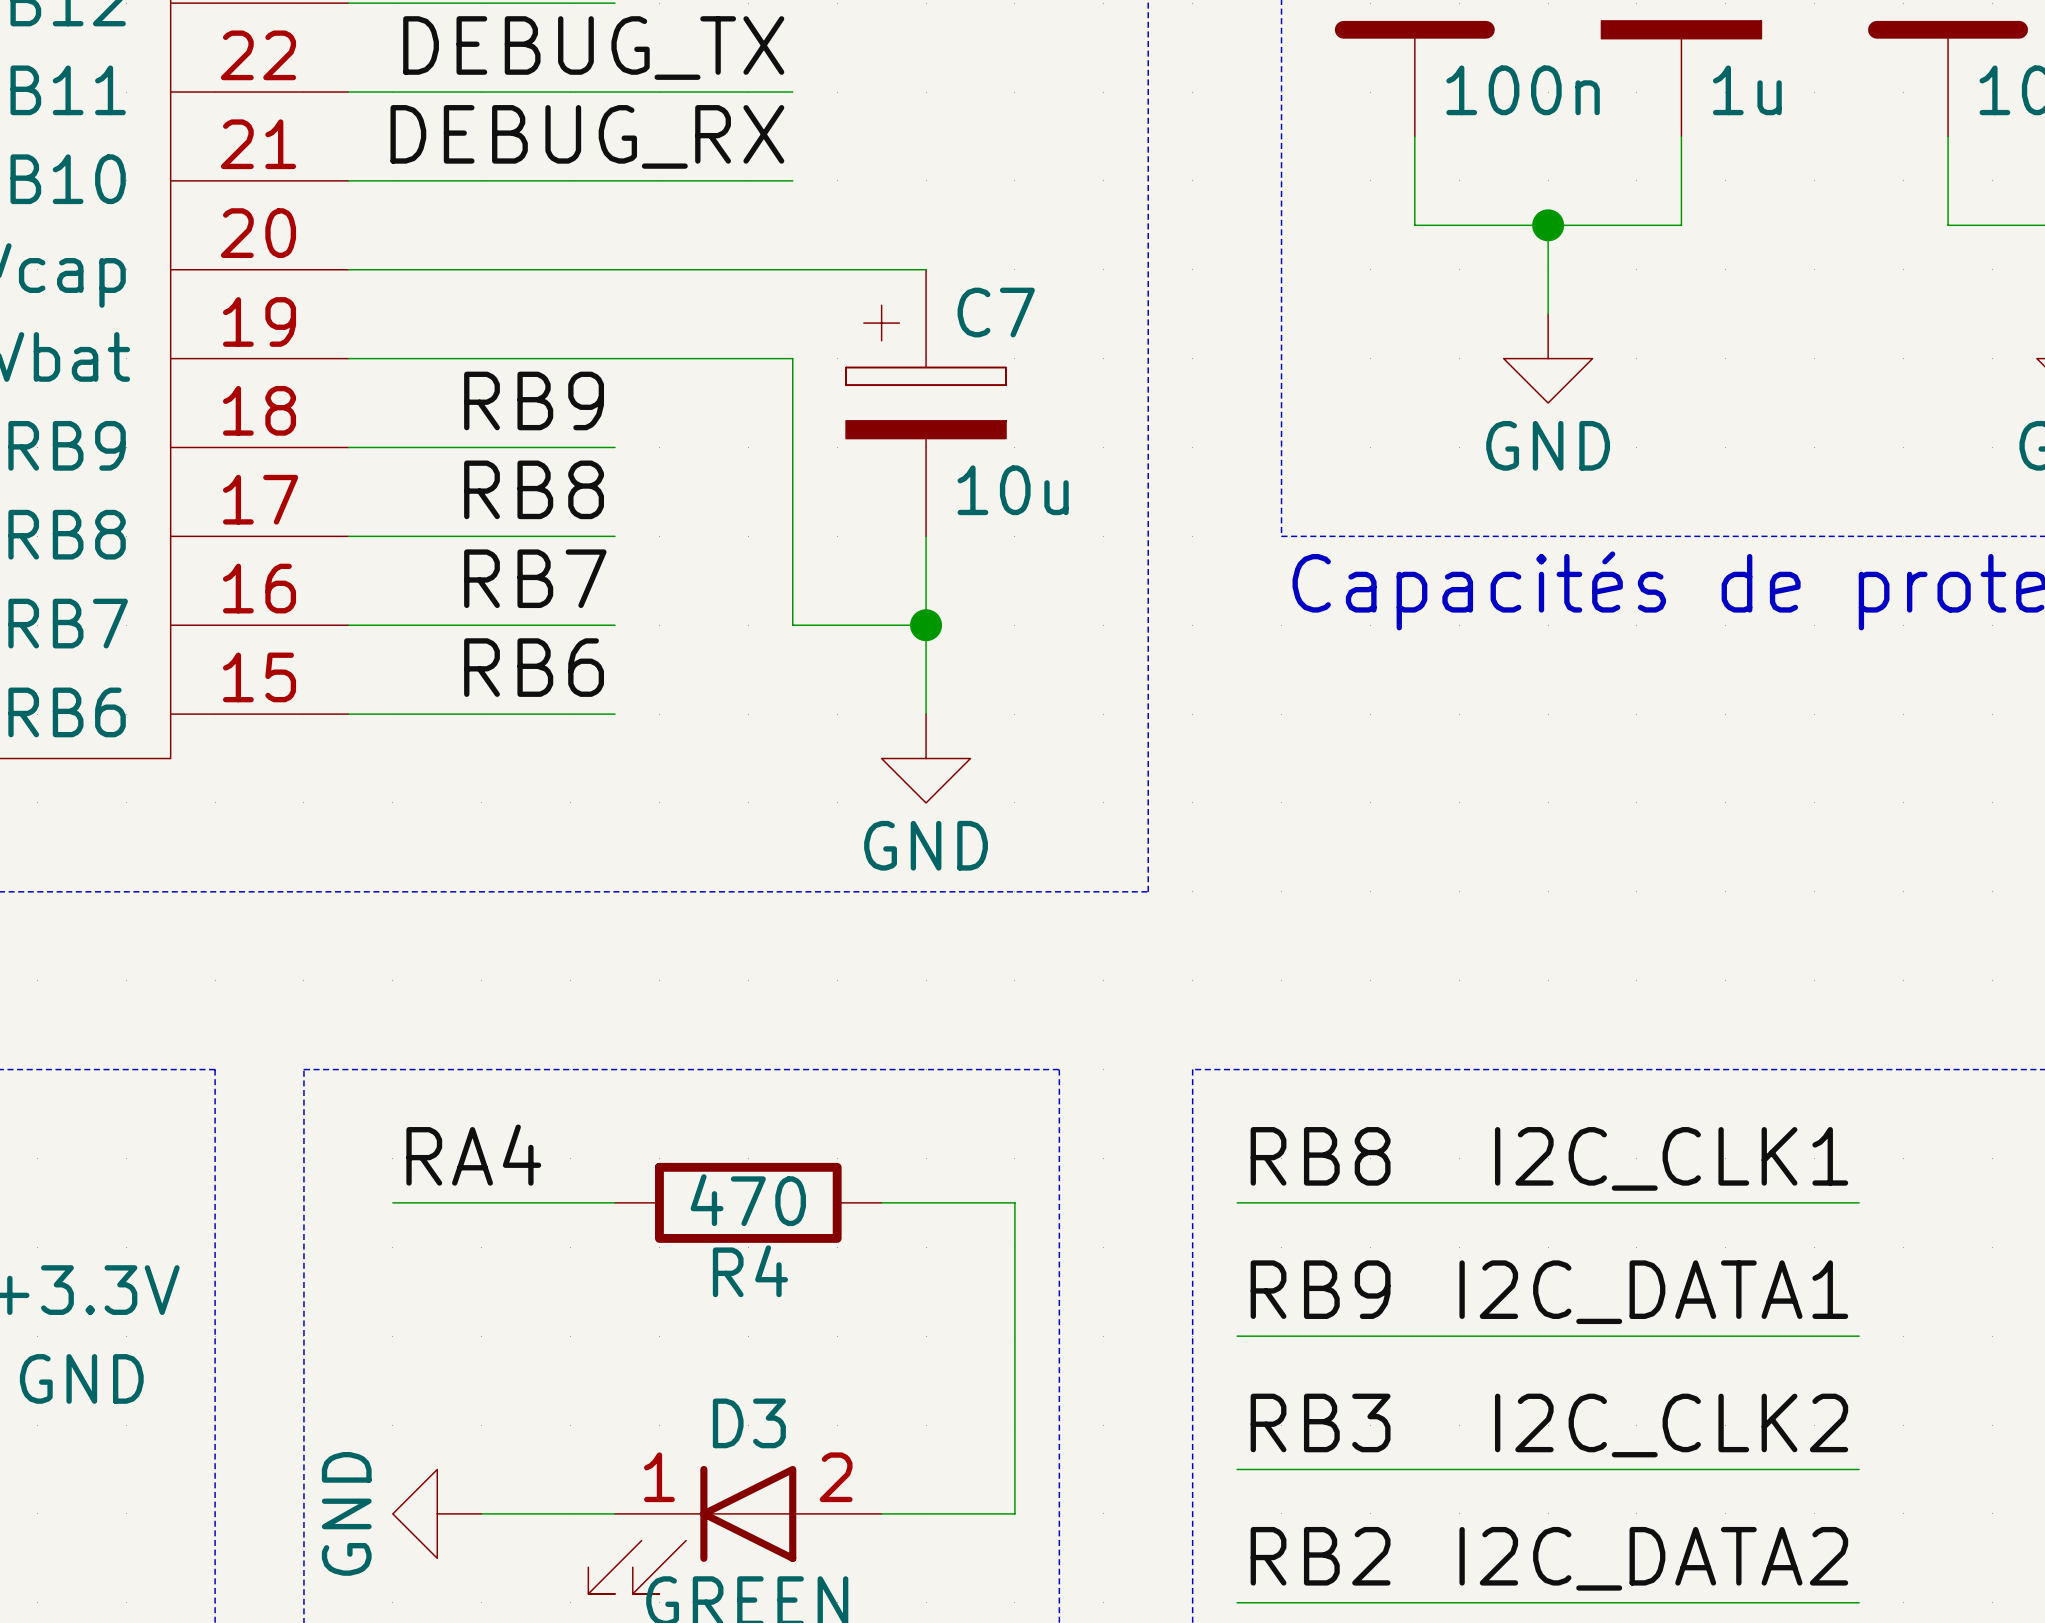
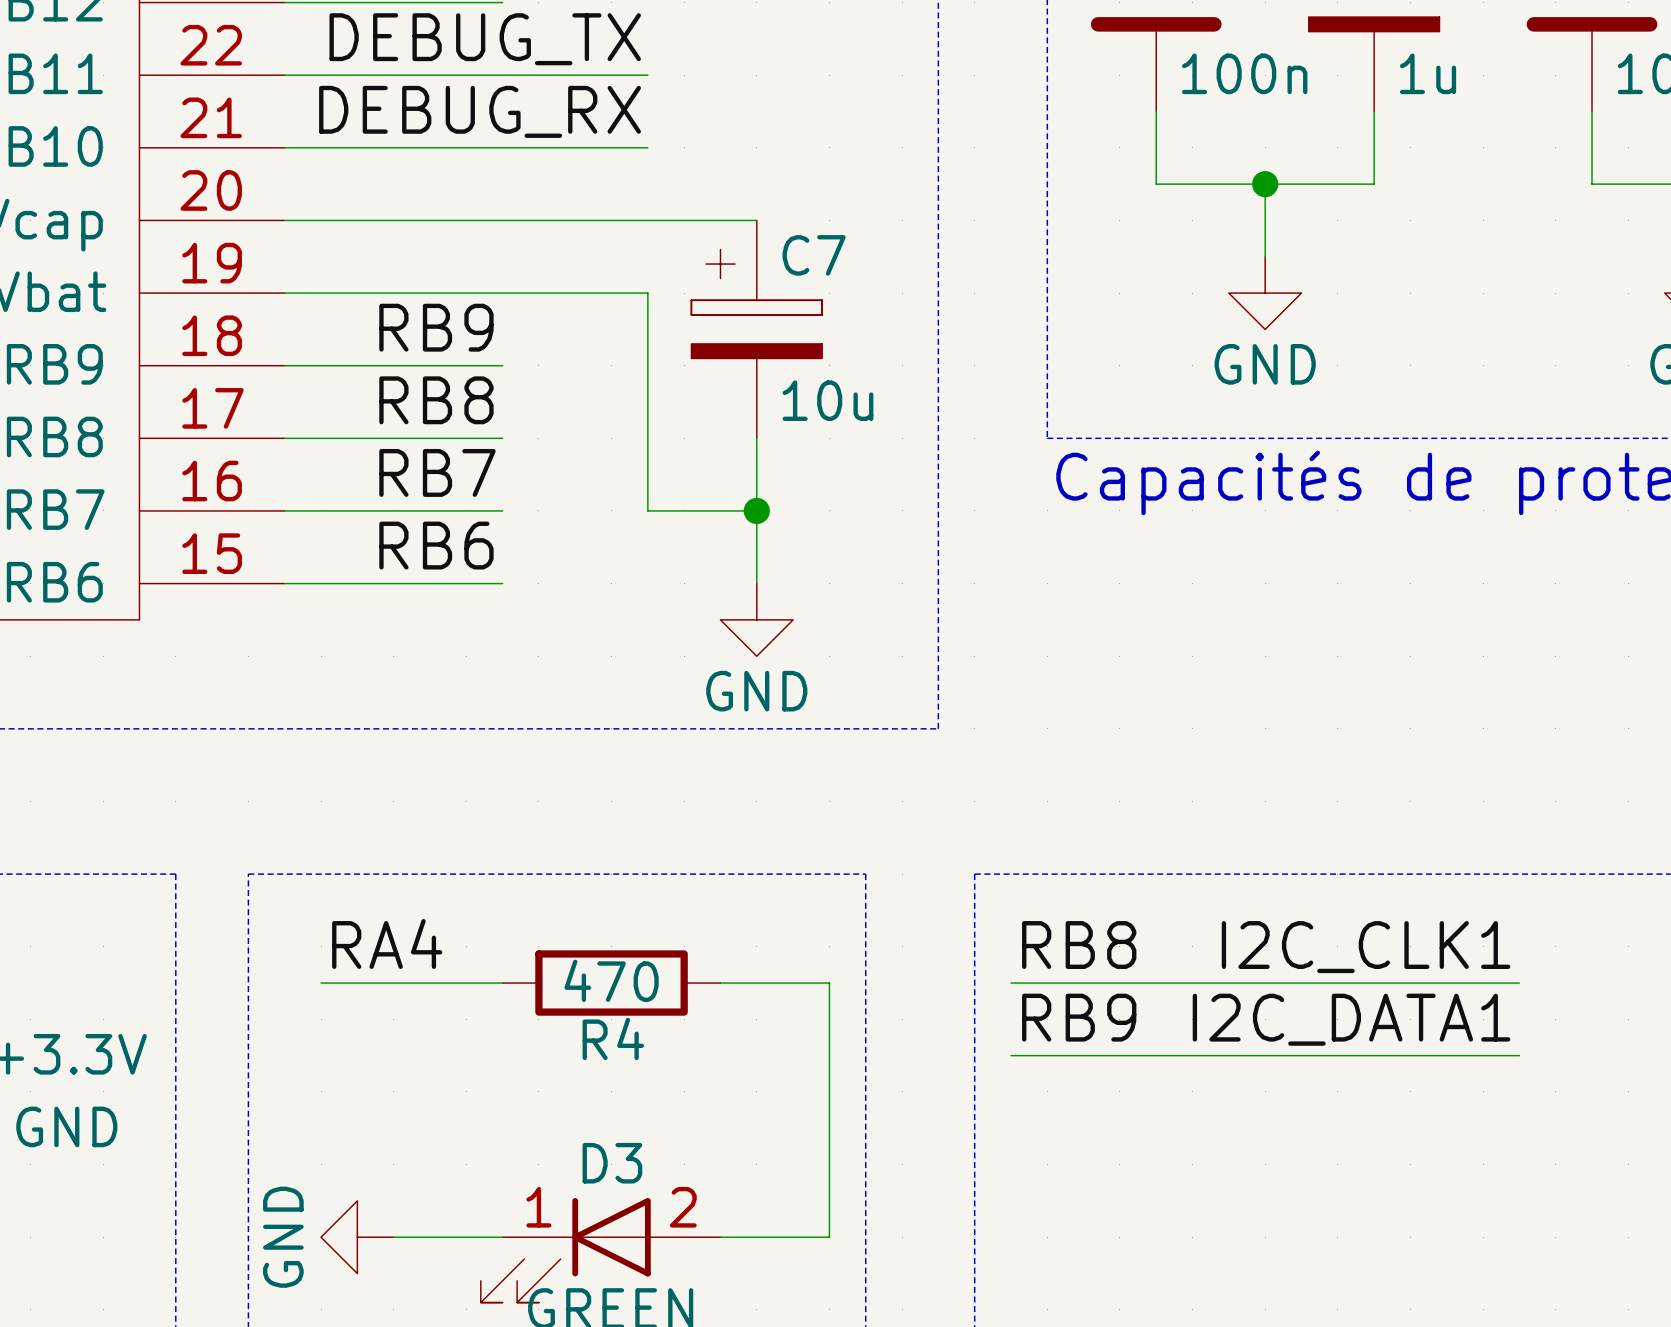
label position: RB9 (1320, 1289) -> RB9 (1079, 1017)
label position: I2C_DATA1 (1653, 1292) -> I2C_DATA1 (1351, 1019)
wire: (1237, 1336) (1859, 1336) -> (1010, 1055) (1519, 1055)
label: RB3 (1320, 1422) -> none
label: I2C_CLK2 (1671, 1425) -> none
wire: (1237, 1469) (1859, 1469) -> none
label: RB2 (1320, 1556) -> none
label: I2C_DATA2 (1653, 1558) -> none
wire: (1237, 1602) (1859, 1602) -> none

